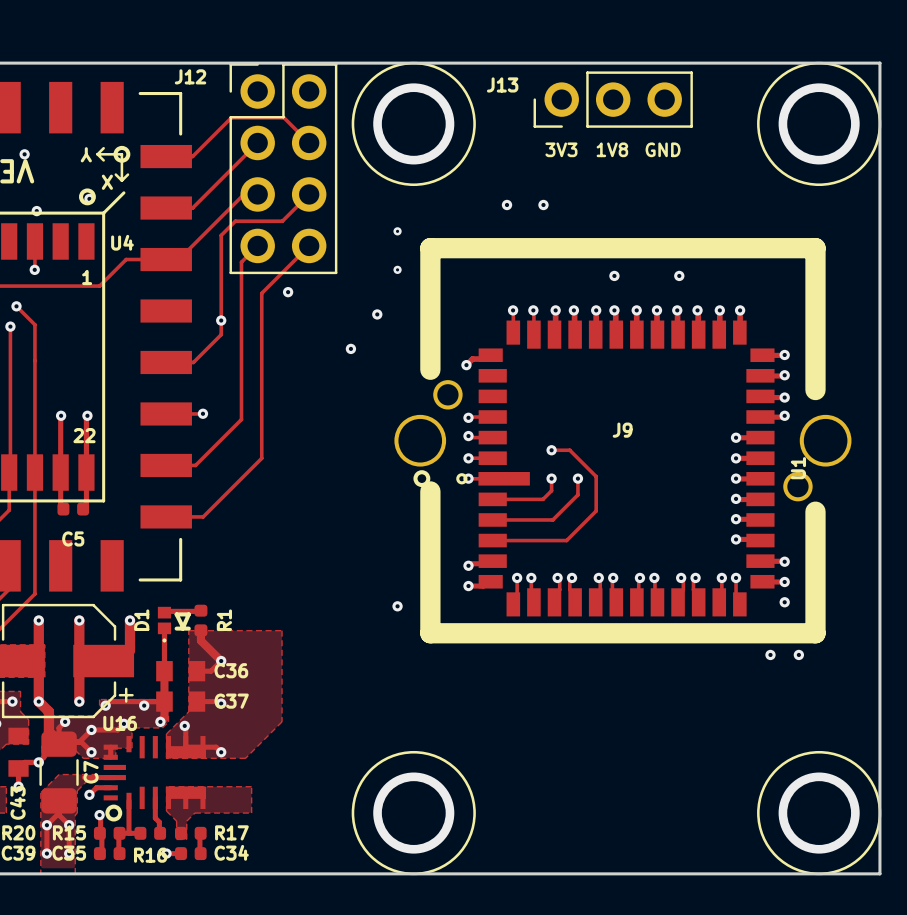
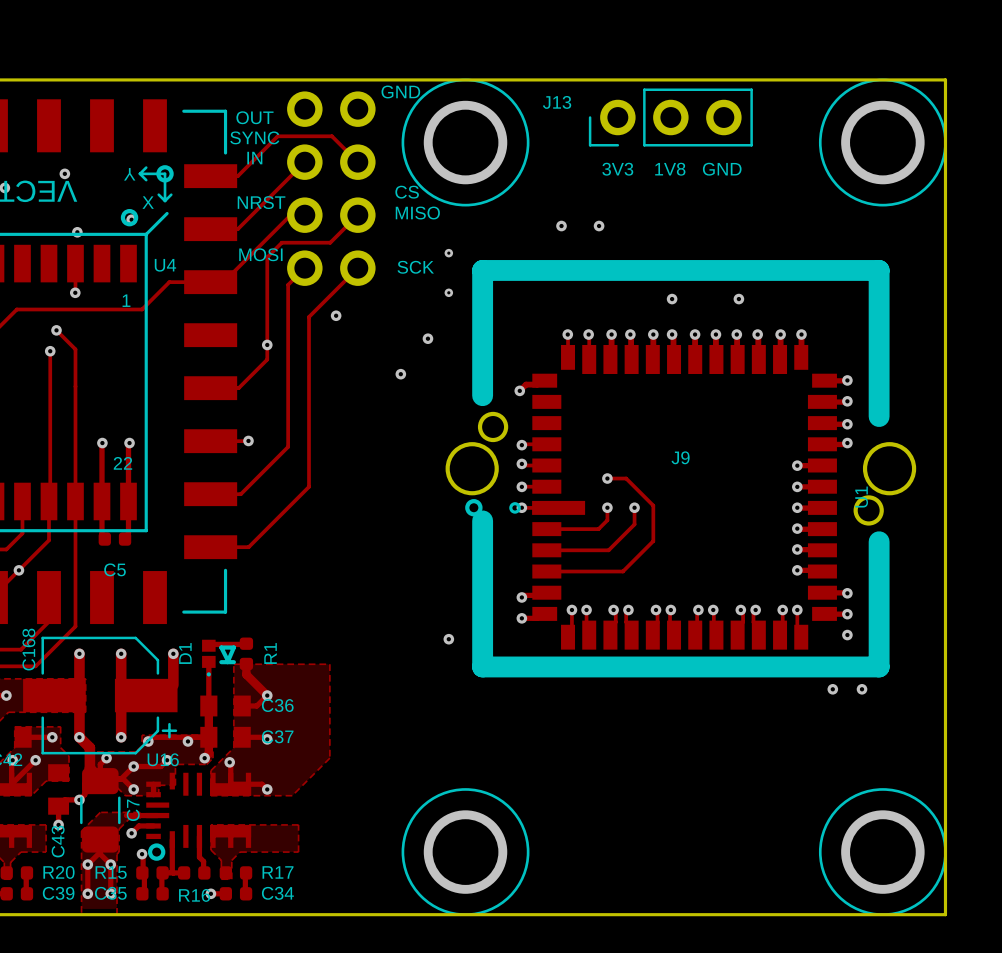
text: none -> GND (400, 91)
text: none -> OUT (254, 117)
text: none -> SYNC (254, 137)
text: none -> IN (254, 158)
J12: (283, 168) -> none
text: none -> CS (407, 192)
text: none -> NRST (261, 202)
text: none -> MISO (417, 213)
text: none -> MOSI (260, 254)
J9 footprint: [394, 238, 852, 644] -> [445, 260, 917, 678]
text: none -> SCK (415, 267)

